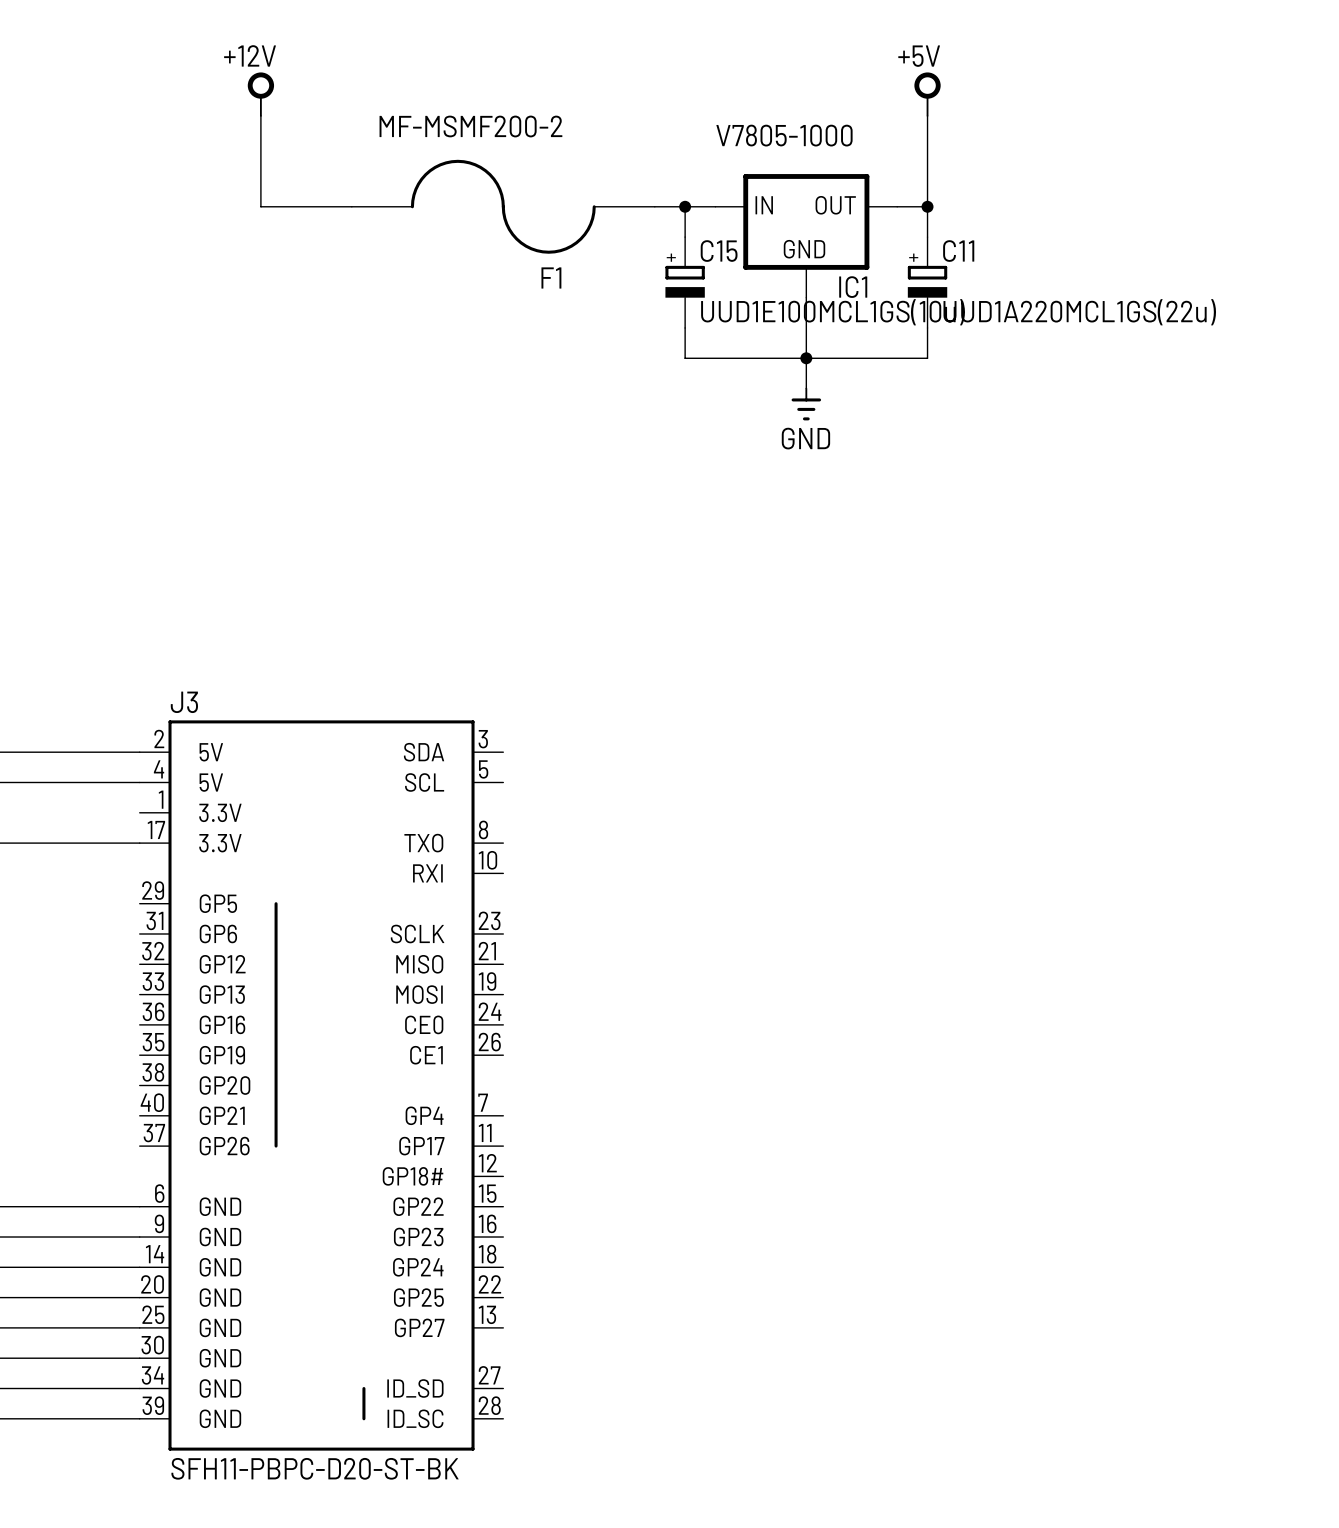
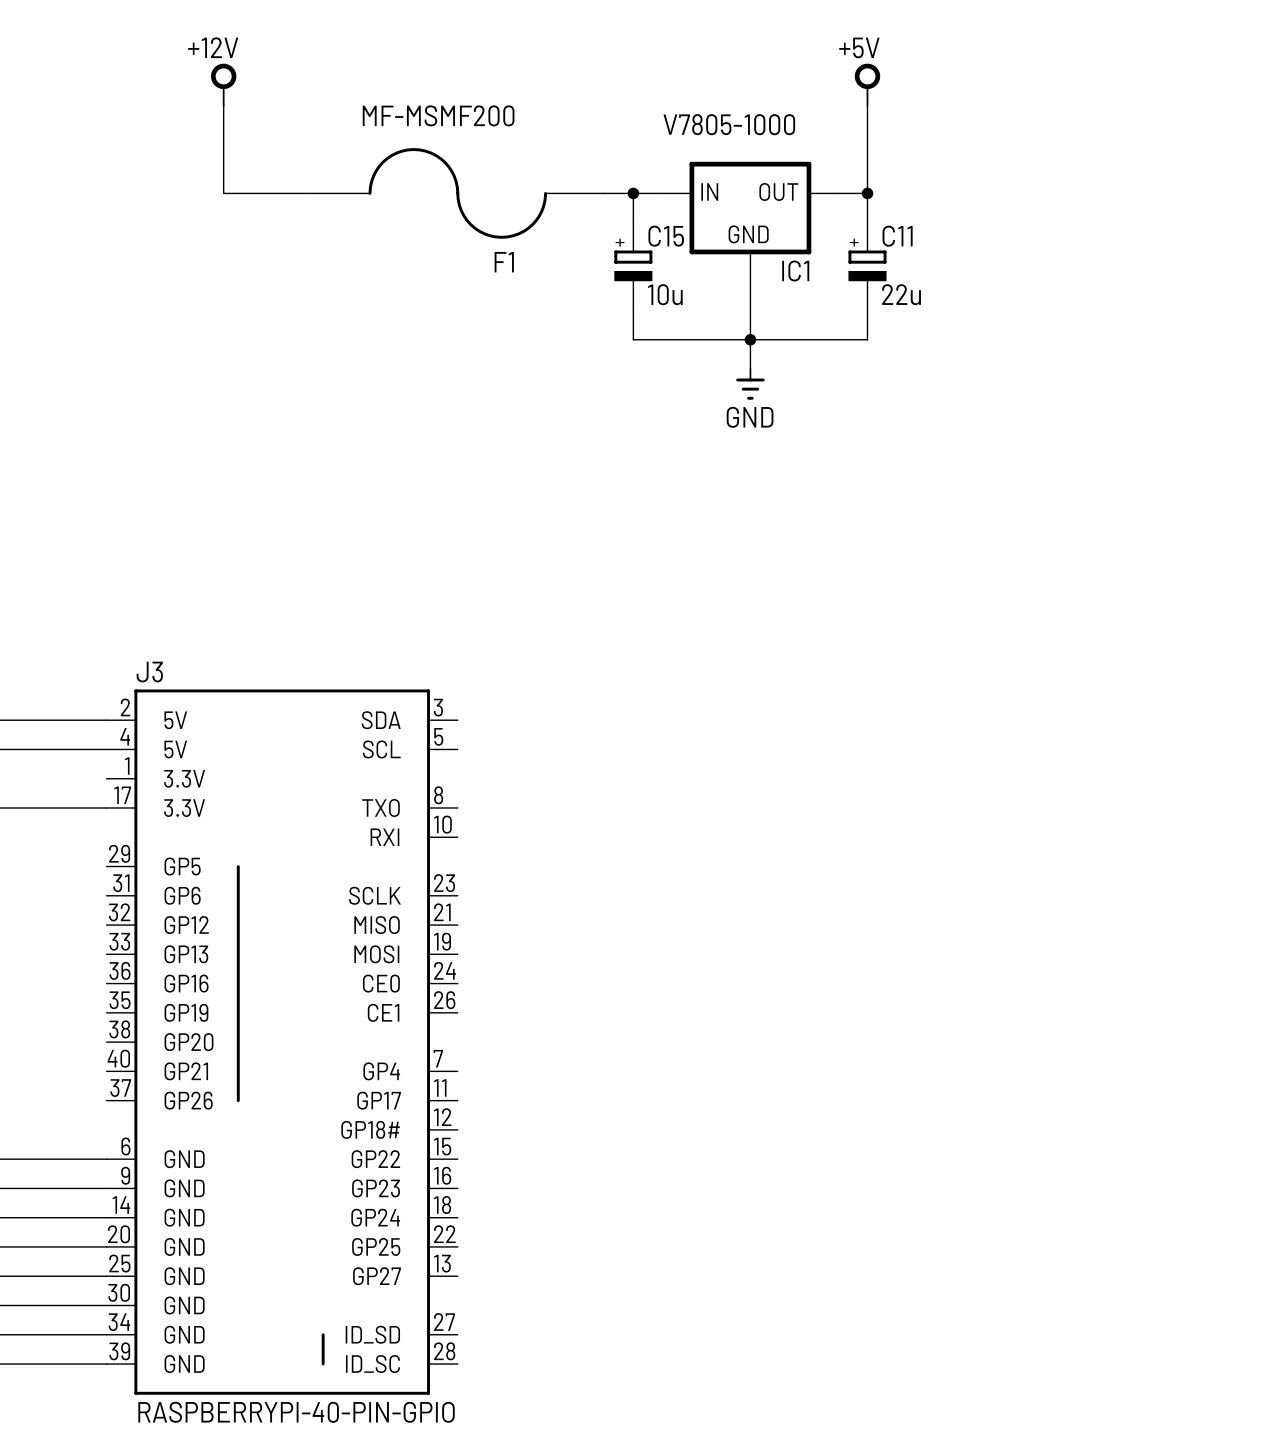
F1 value: MF-MSMF200-2 (470, 126) -> MF-MSMF200 (438, 115)
C15 value: UUD1E100MCL1GS(10u) (833, 312) -> 10u (665, 294)
C11 value: UUD1A220MCL1GS(22u) (1079, 312) -> 22u (901, 294)
J3 value: SFH11-PBPC-D20-ST-BK (315, 1468) -> RASPBERRYPI-40-PIN-GPIO (296, 1412)

